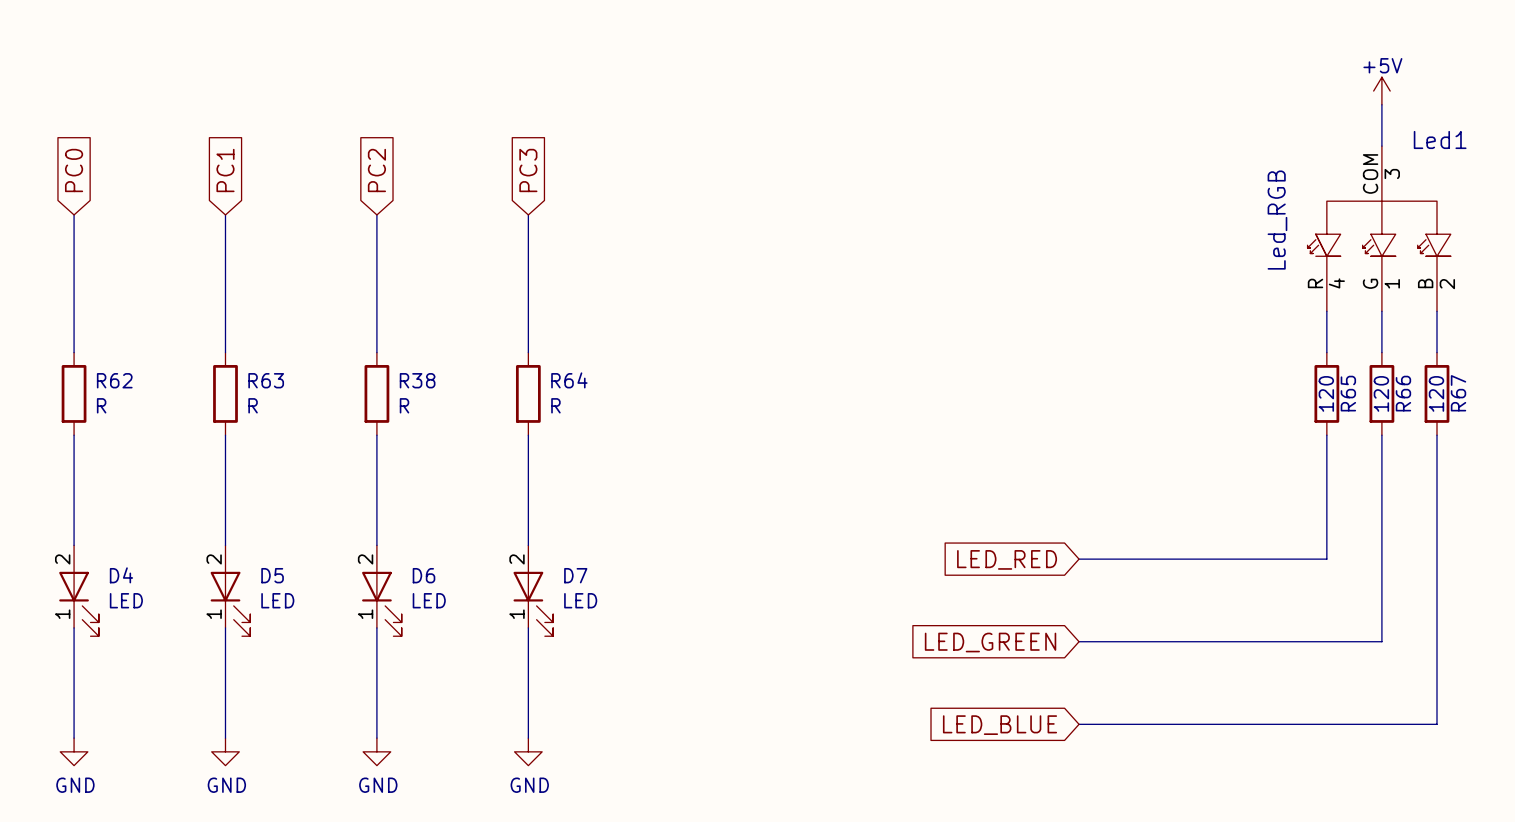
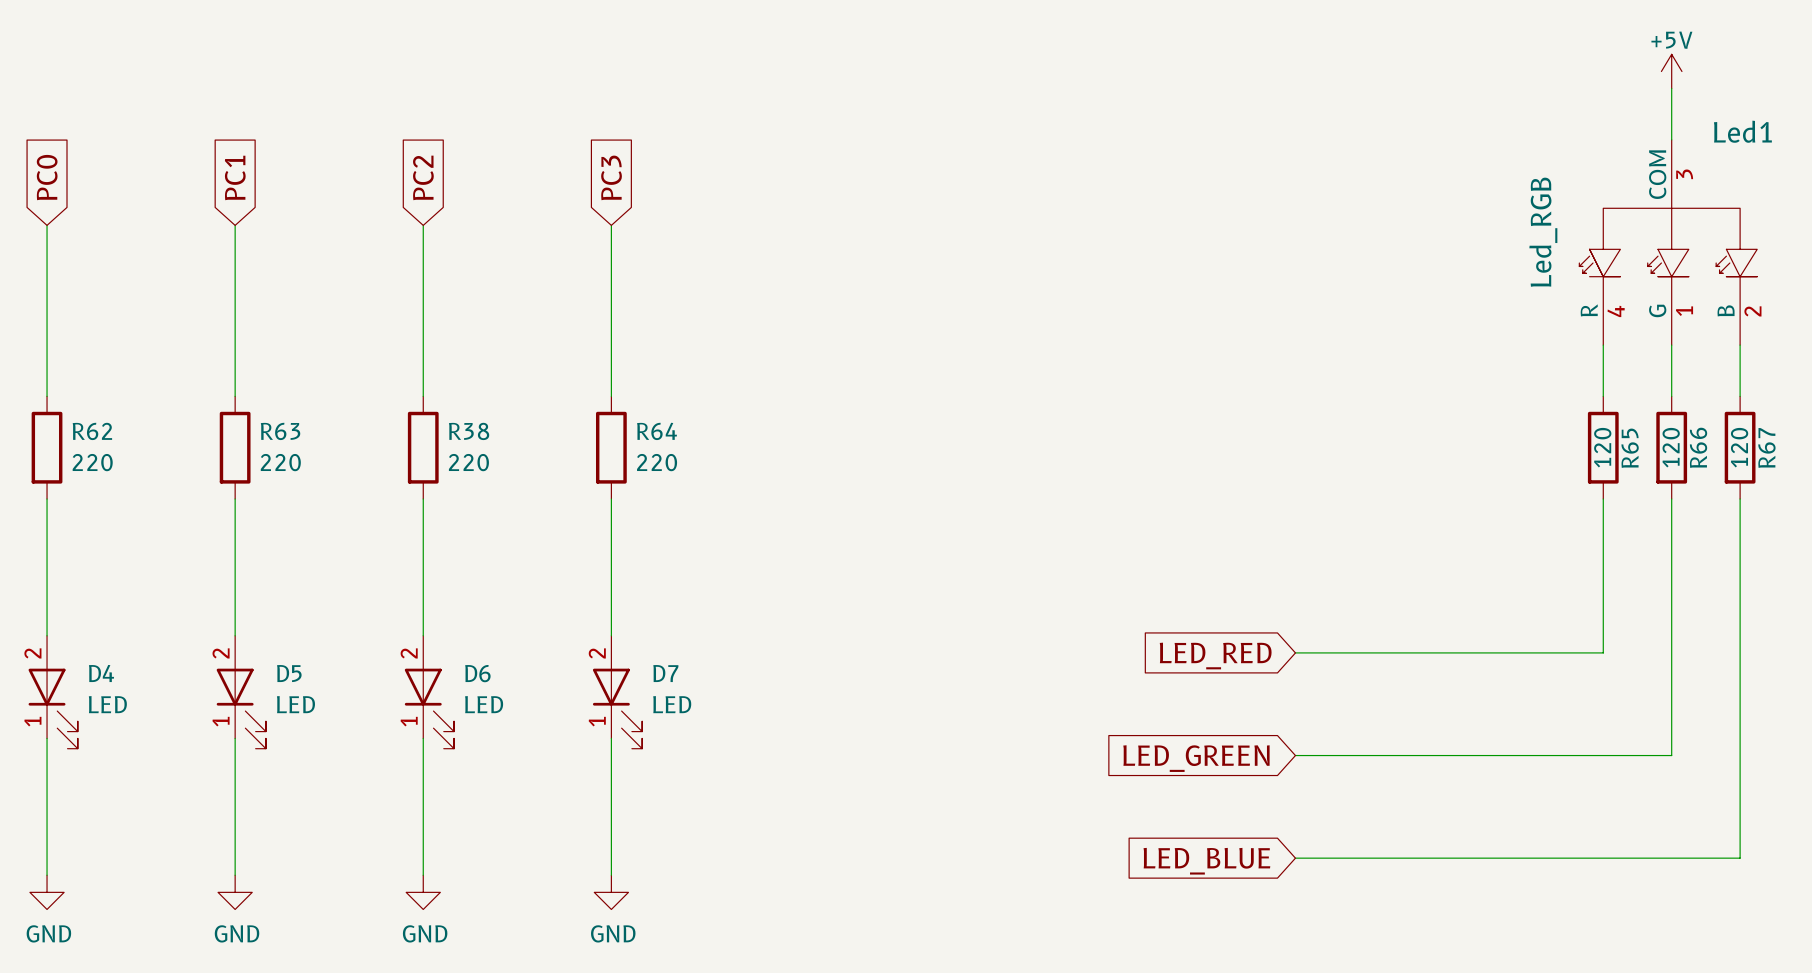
R62 value: R (101, 405) -> 220 (92, 462)
R63 value: R (253, 405) -> 220 (280, 462)
R38 value: R (404, 405) -> 220 (468, 462)
R64 value: R (555, 405) -> 220 (657, 462)

